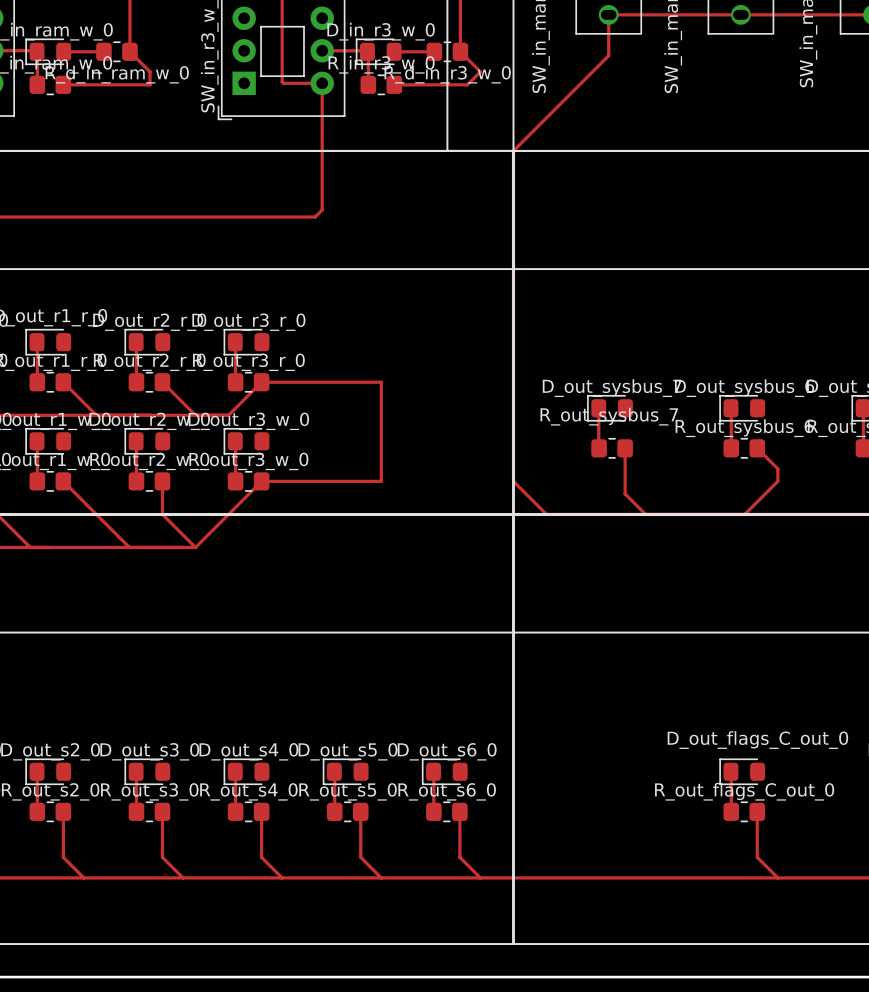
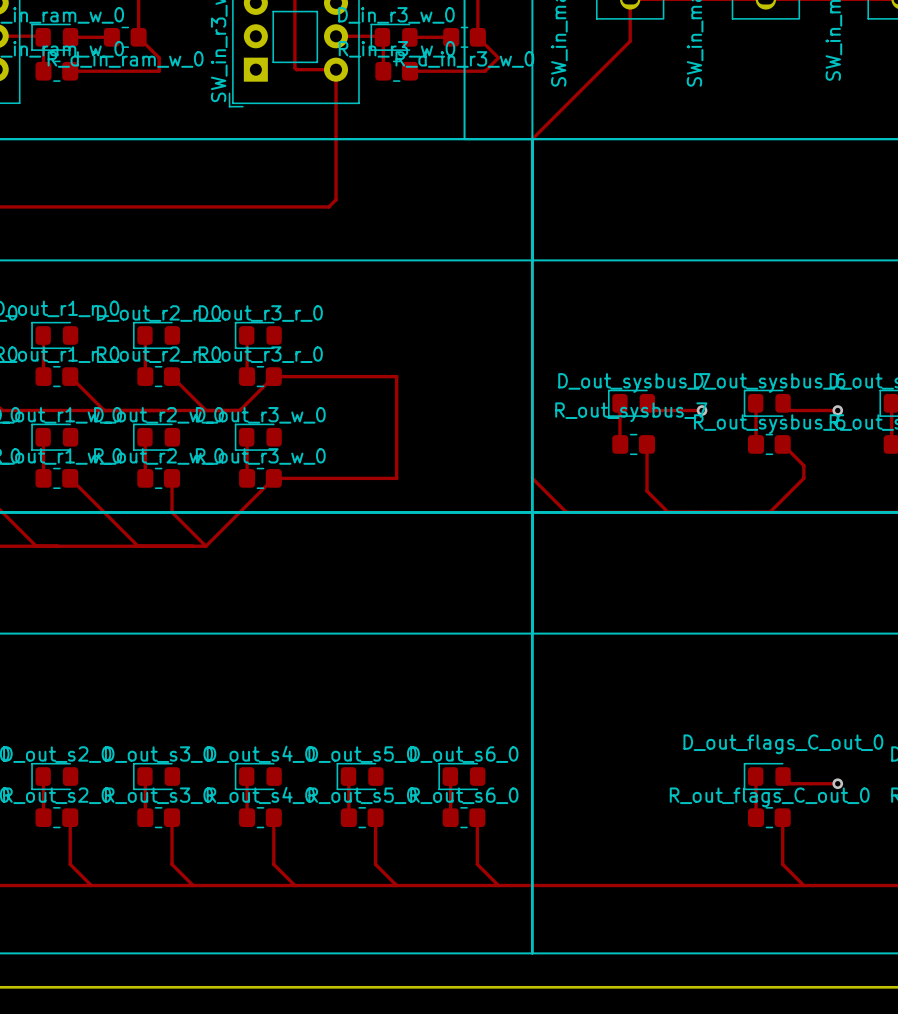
track: none -> (647, 403) (654, 410) (702, 410)
track: none -> (783, 403) (790, 410) (837, 410)
via: none -> (702, 410)
via: none -> (837, 410)
track: none -> (783, 776) (790, 783) (837, 783)
via: none -> (837, 783)

